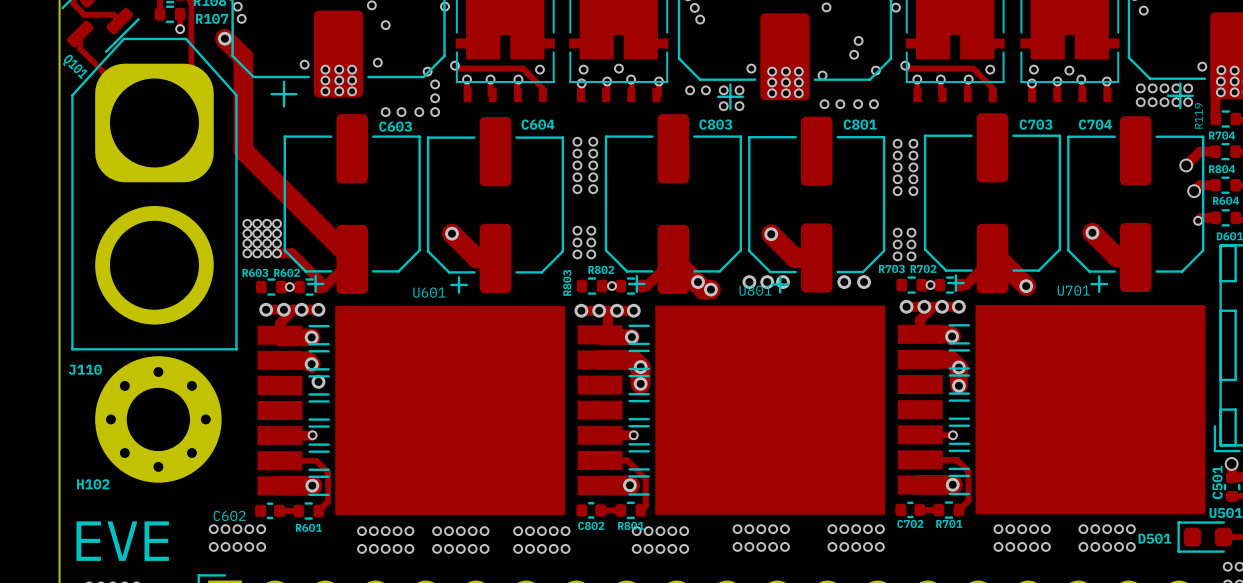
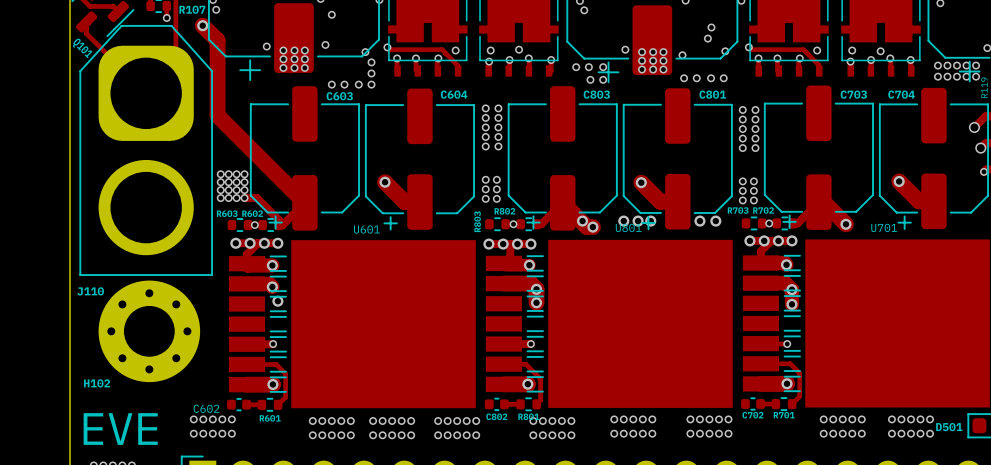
via: (739, 90) -> none
via: none -> (590, 79)
via: (739, 106) -> none

